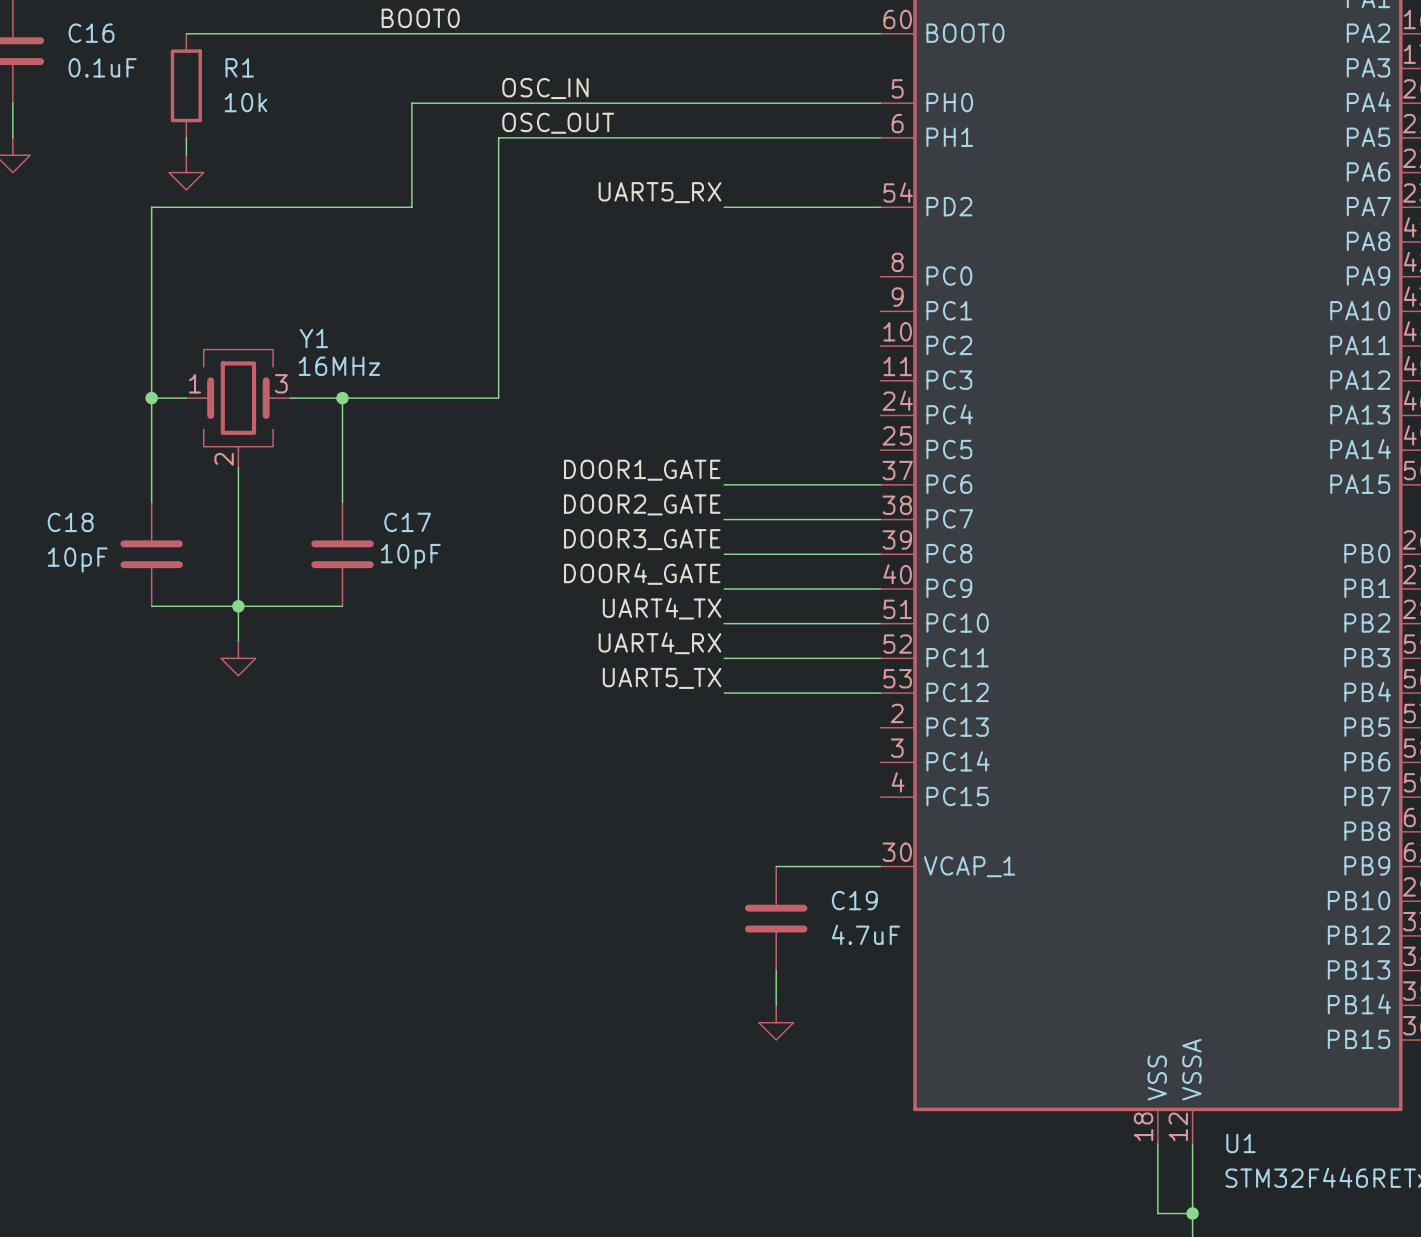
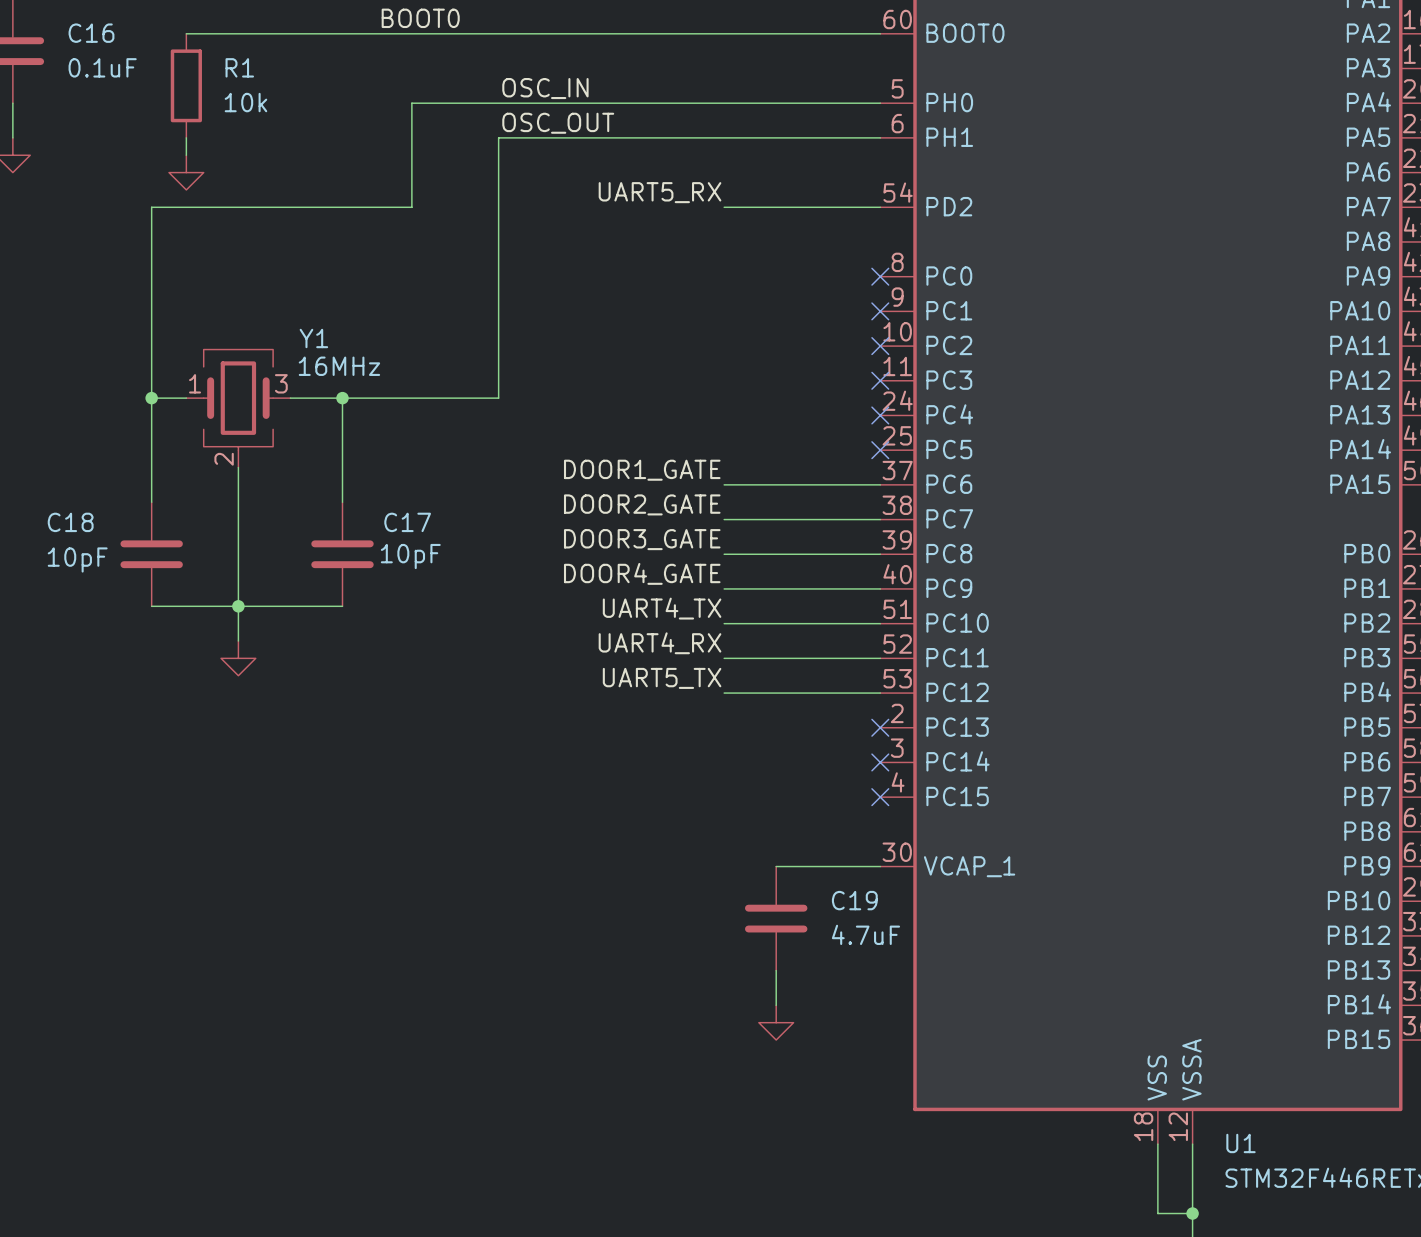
no-connect mark: none -> (880, 276)
no-connect mark: none -> (880, 311)
no-connect mark: none -> (880, 346)
no-connect mark: none -> (880, 380)
no-connect mark: none -> (880, 415)
no-connect mark: none -> (880, 450)
no-connect mark: none -> (880, 727)
no-connect mark: none -> (880, 762)
no-connect mark: none -> (880, 797)

